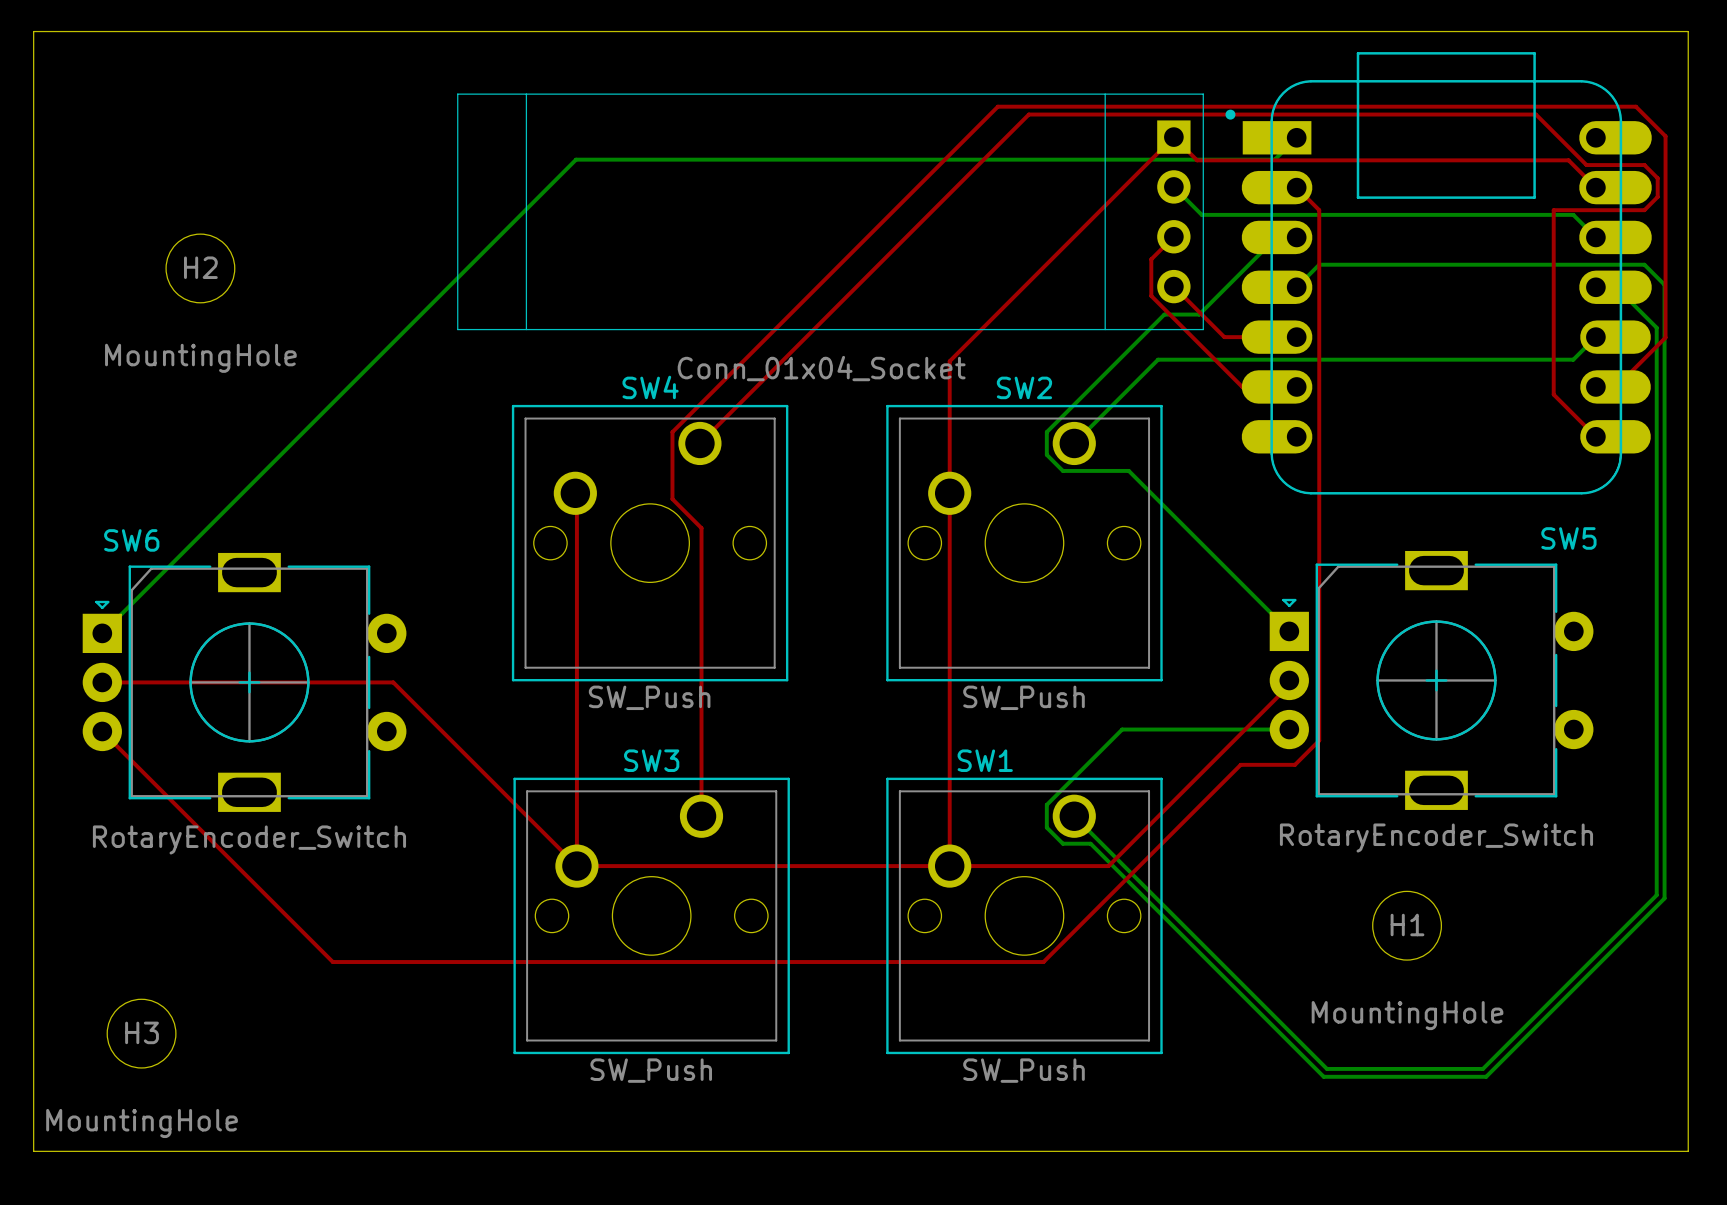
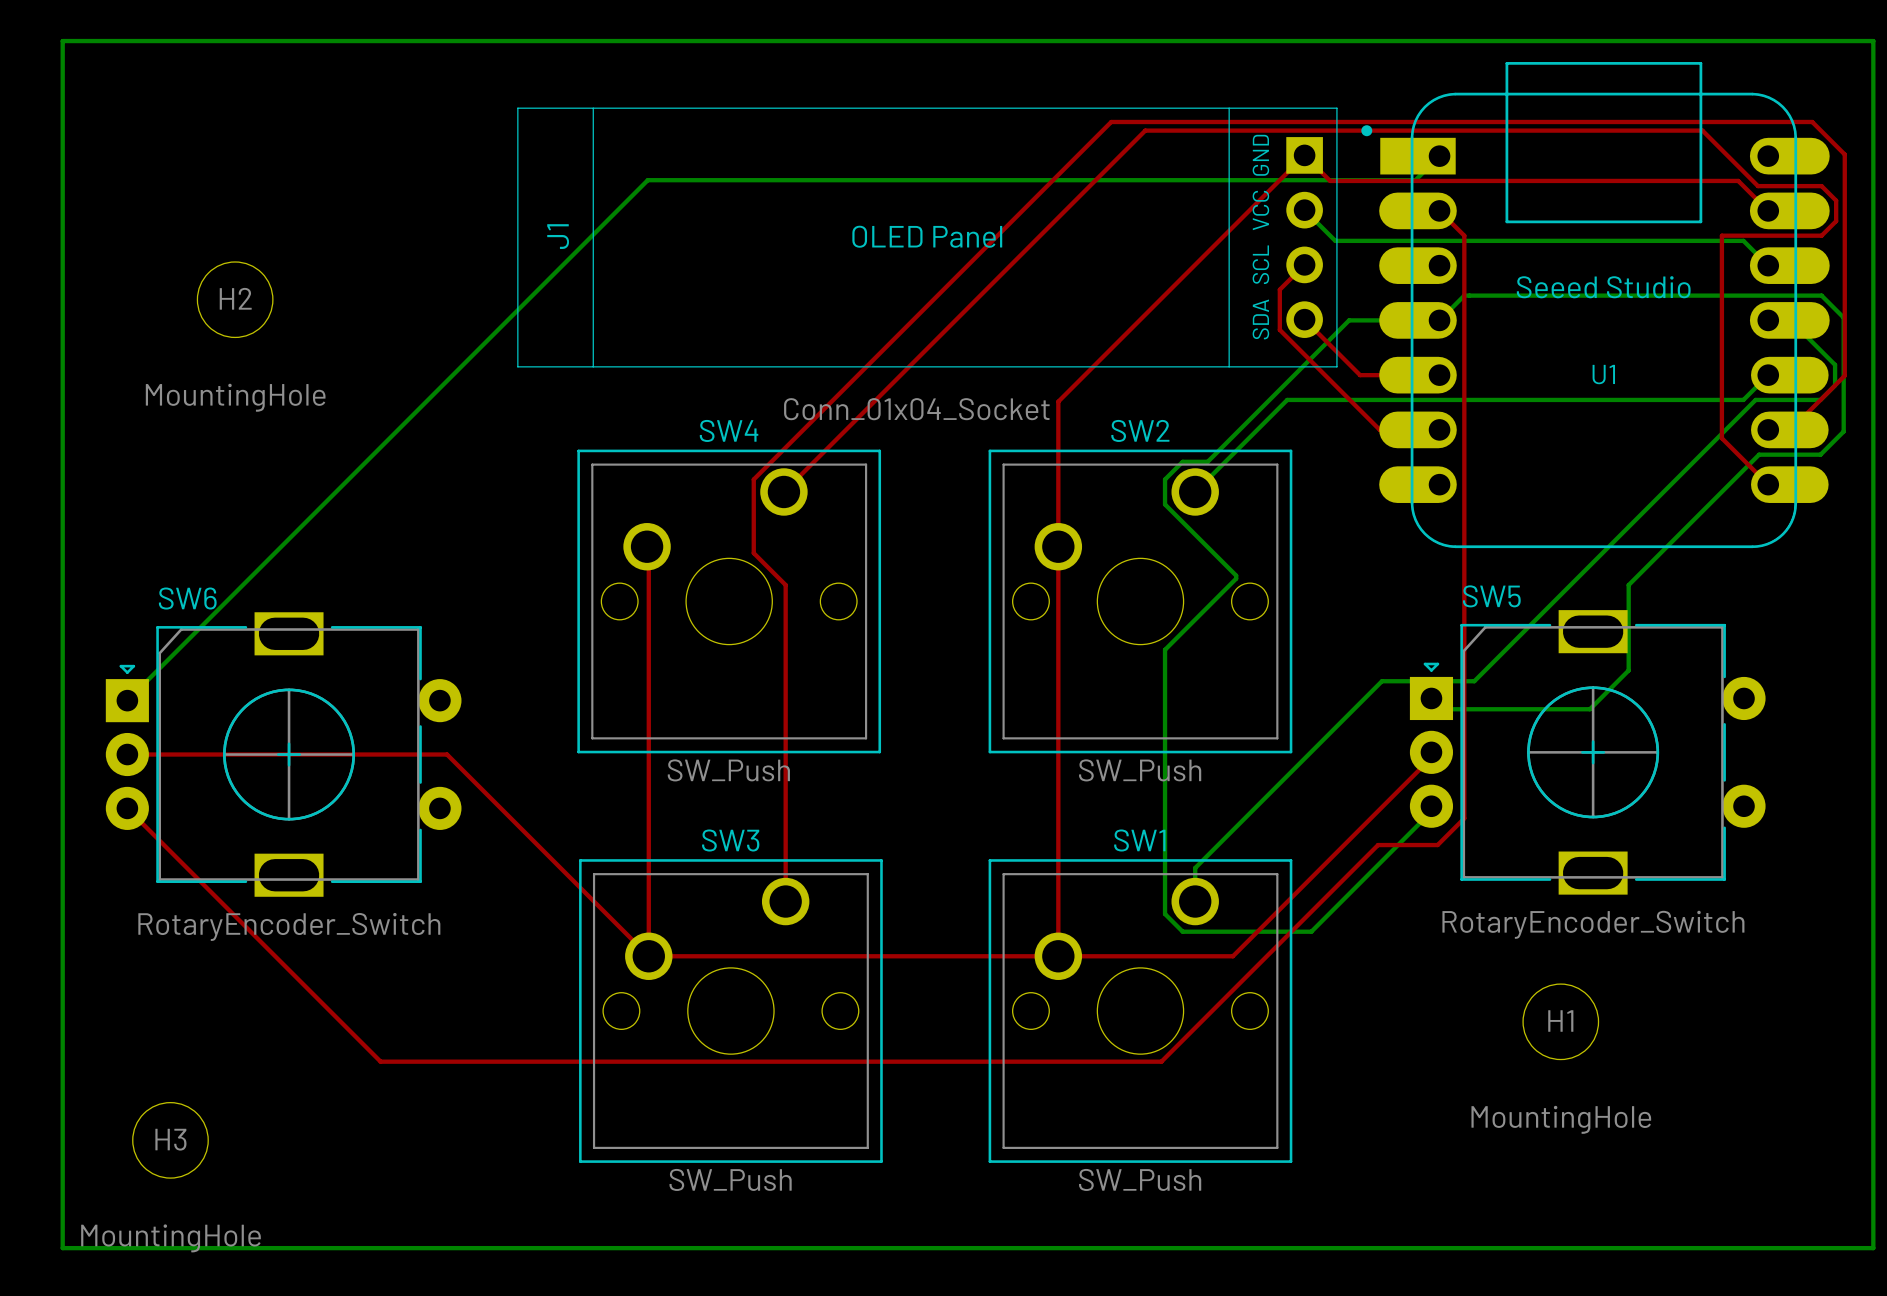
board edge: (33, 31) (1688, 31) (1688, 1151) (33, 1151) (33, 31) -> none
bottom track: none -> (62, 41) (1873, 41) (1873, 1248) (62, 1248) (62, 41)
J1 text: none -> GND (1260, 155)
J1 text: none -> VCC (1260, 210)
J1 name: none -> J1 (558, 236)
J1 text: none -> OLED Panel (927, 236)
J1 text: none -> SCL (1260, 264)
bottom track: (1276, 237) (1199, 314) (1164, 314) (1062, 415) -> (1439, 320) (1349, 320) (1207, 461) (1182, 461)
U1 text: none -> Seeed Studio (1603, 287)
J1 text: none -> SDA (1260, 319)
U1 name: none -> U1 (1603, 374)
bottom track: (1656, 346) (1656, 895) (1482, 1068) (1327, 1068) (1074, 816) -> (1835, 385) (1820, 399) (1755, 399) (1474, 681) (1381, 681) (1195, 867) (1195, 901)
bottom track: (1664, 388) (1664, 898) (1486, 1076) (1323, 1076) (1090, 843) -> (1843, 431) (1820, 454) (1759, 454) (1628, 585) (1628, 670) (1589, 709) (1426, 709)
bottom track: (1062, 470) (1128, 470) (1289, 631) -> (1182, 522) (1236, 575) (1236, 578) (1165, 649) (1165, 889)
SW5 name position: SW5 (1568, 538) -> SW5 (1491, 596)
SW6 name position: SW6 (131, 540) -> SW6 (187, 598)
bottom track: (1289, 729) (1122, 729) (1046, 804) -> none
bottom track: none -> (1426, 817) (1311, 931) (1213, 931)
SW1 name position: SW1 (985, 760) -> SW1 (1139, 840)

